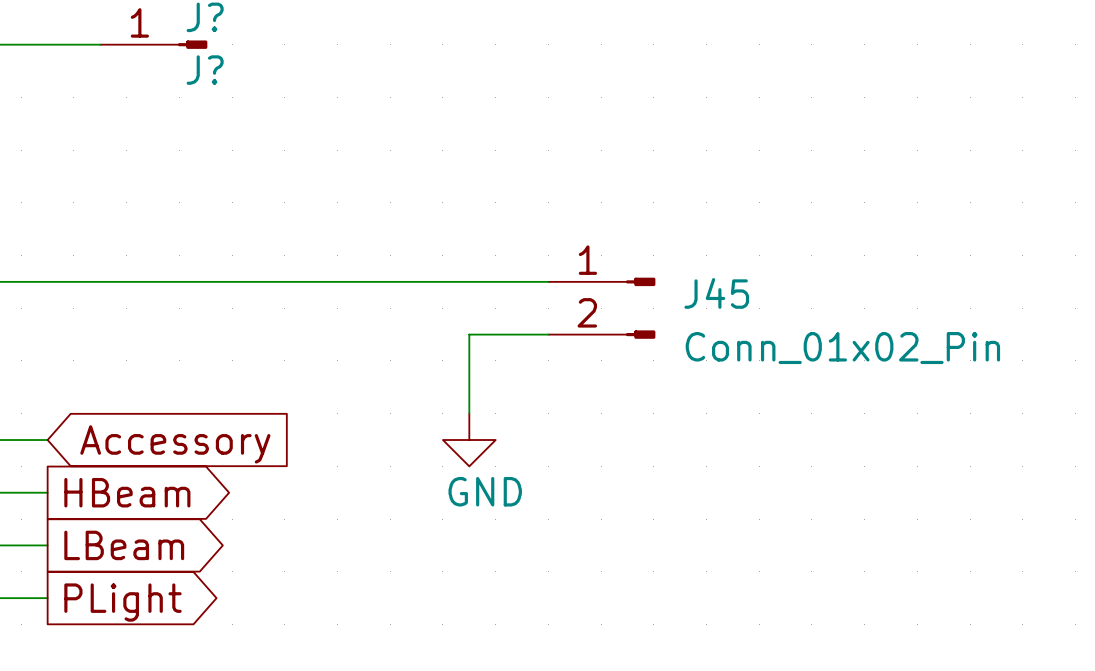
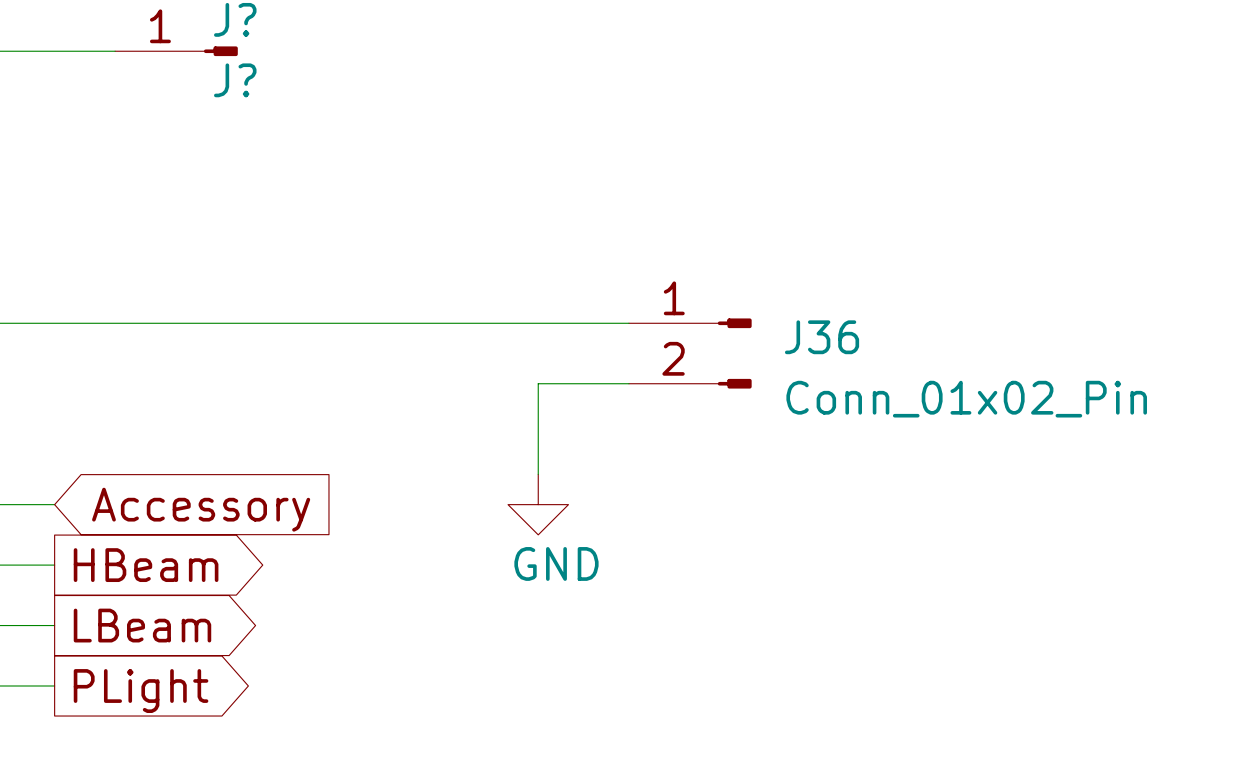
J45 name: J45 (716, 293) -> J36 (822, 337)

